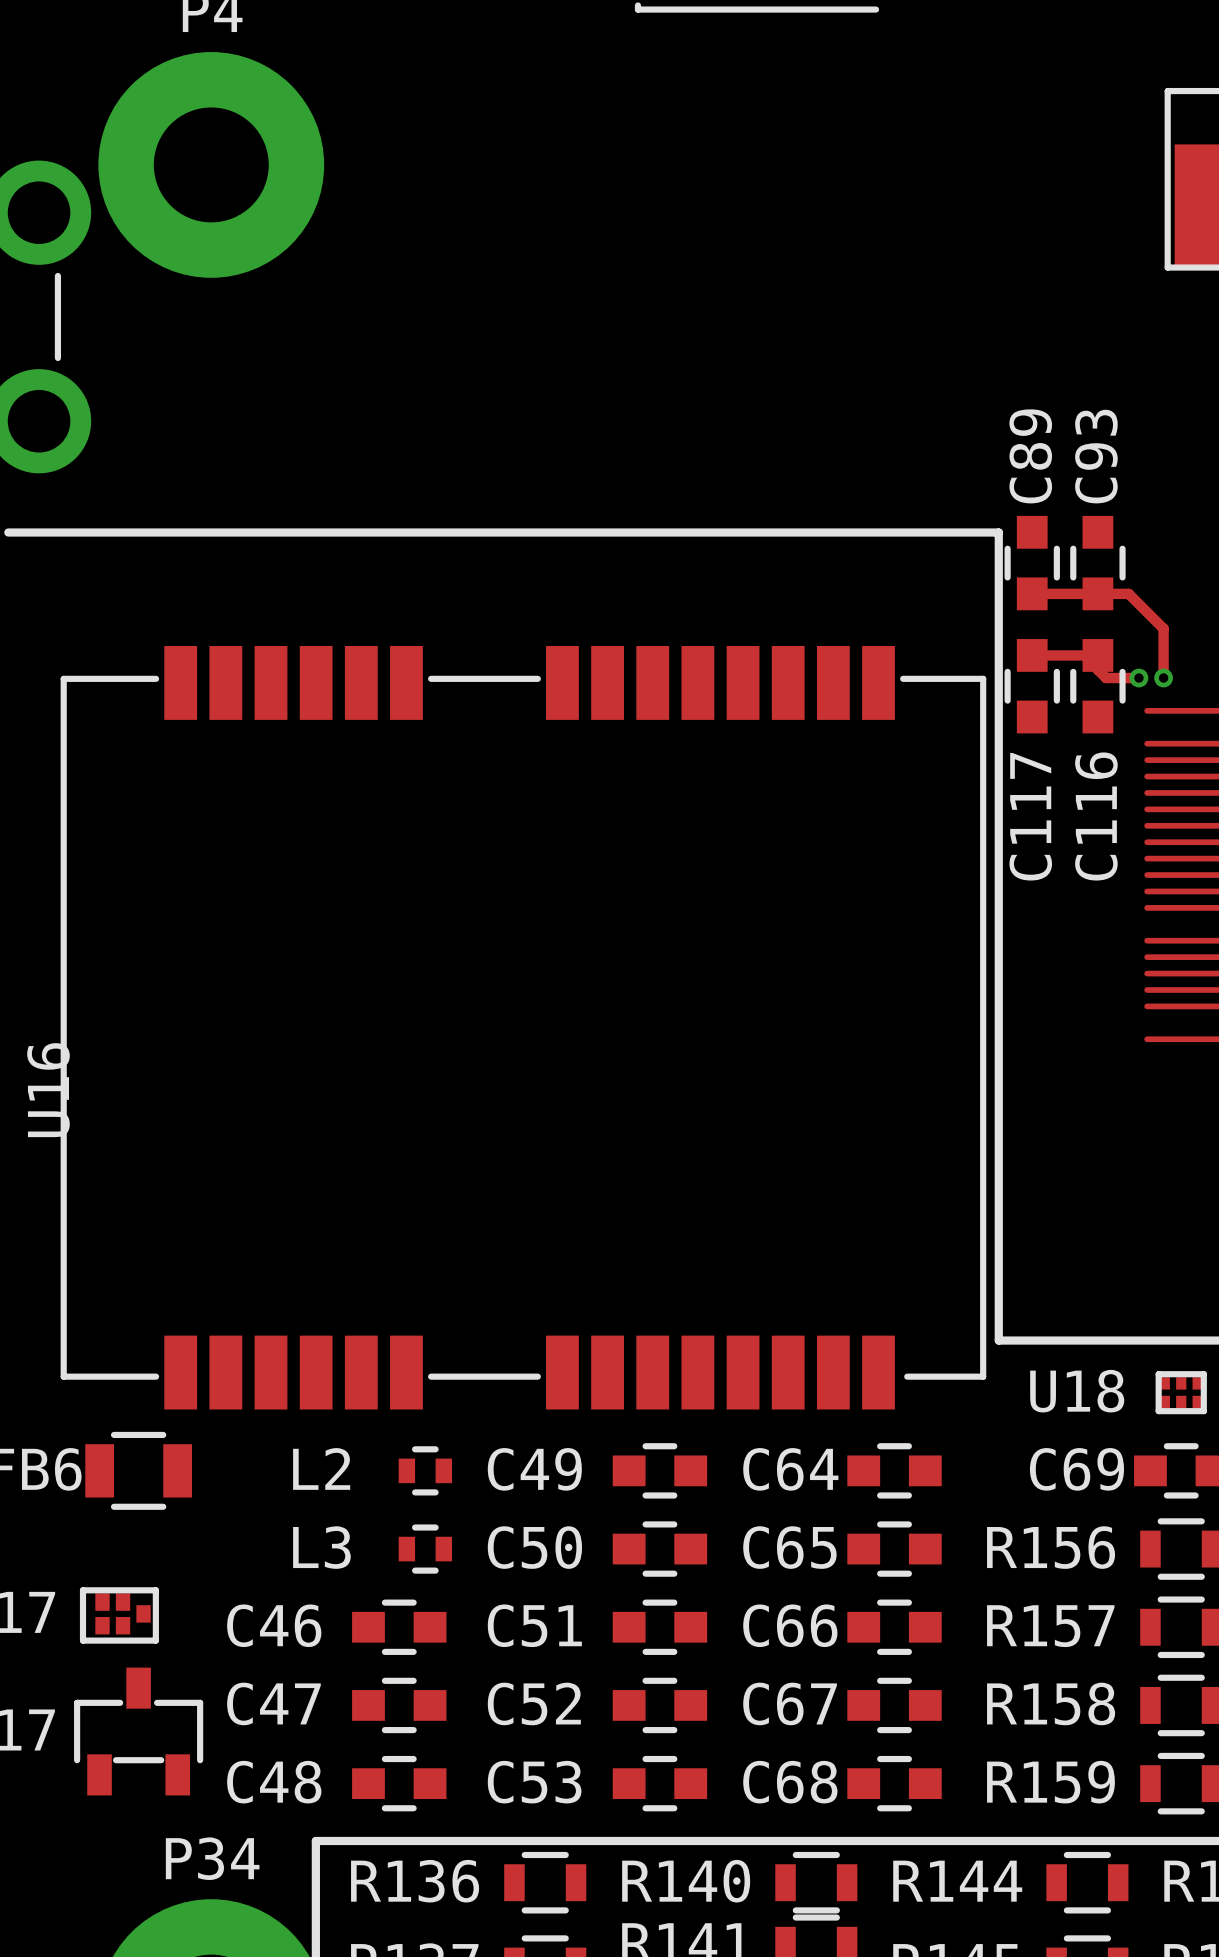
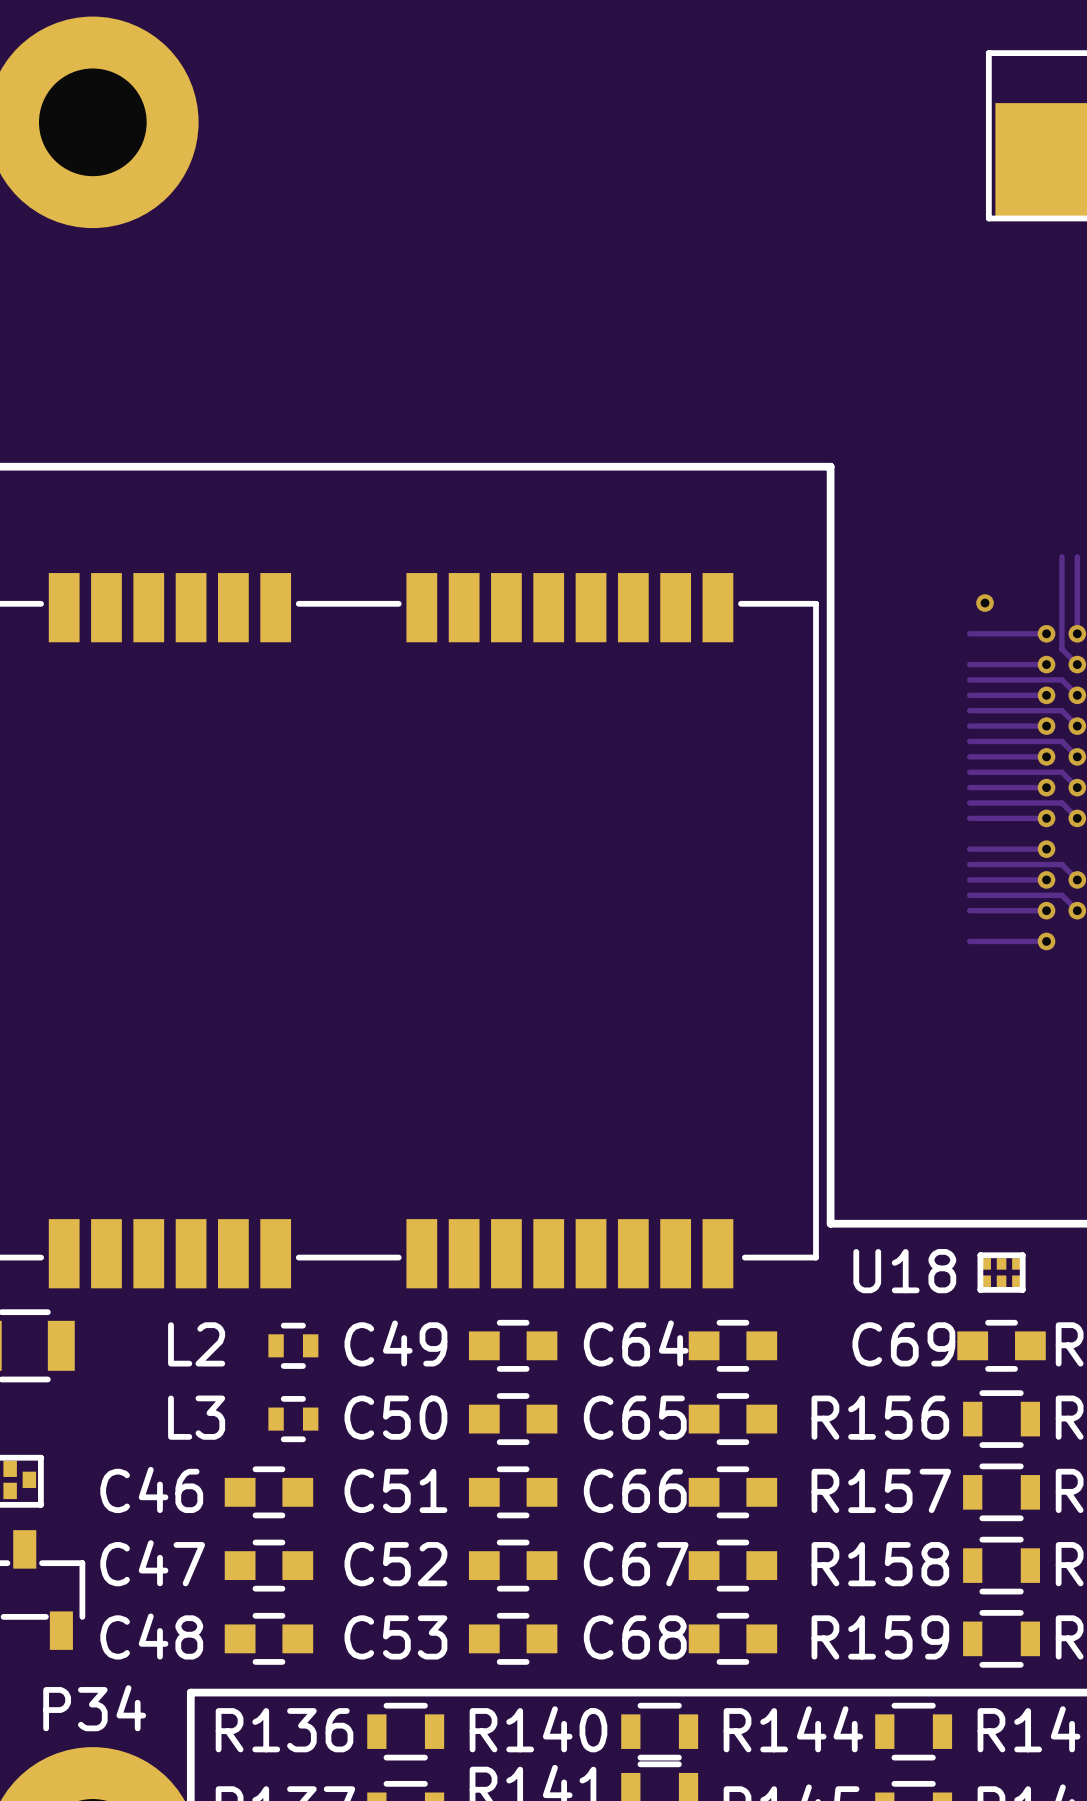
C89: (1032, 563) -> none
C93: (1097, 563) -> none
track: (1032, 593) (1128, 593) (1163, 628) (1163, 678) -> none
track: (1032, 655) (1097, 655) -> none
track: (1097, 655) (1097, 669) (1106, 678) (1138, 678) -> none
via: (1138, 678) -> none
C117: (1032, 686) -> none
C116: (1097, 686) -> none

